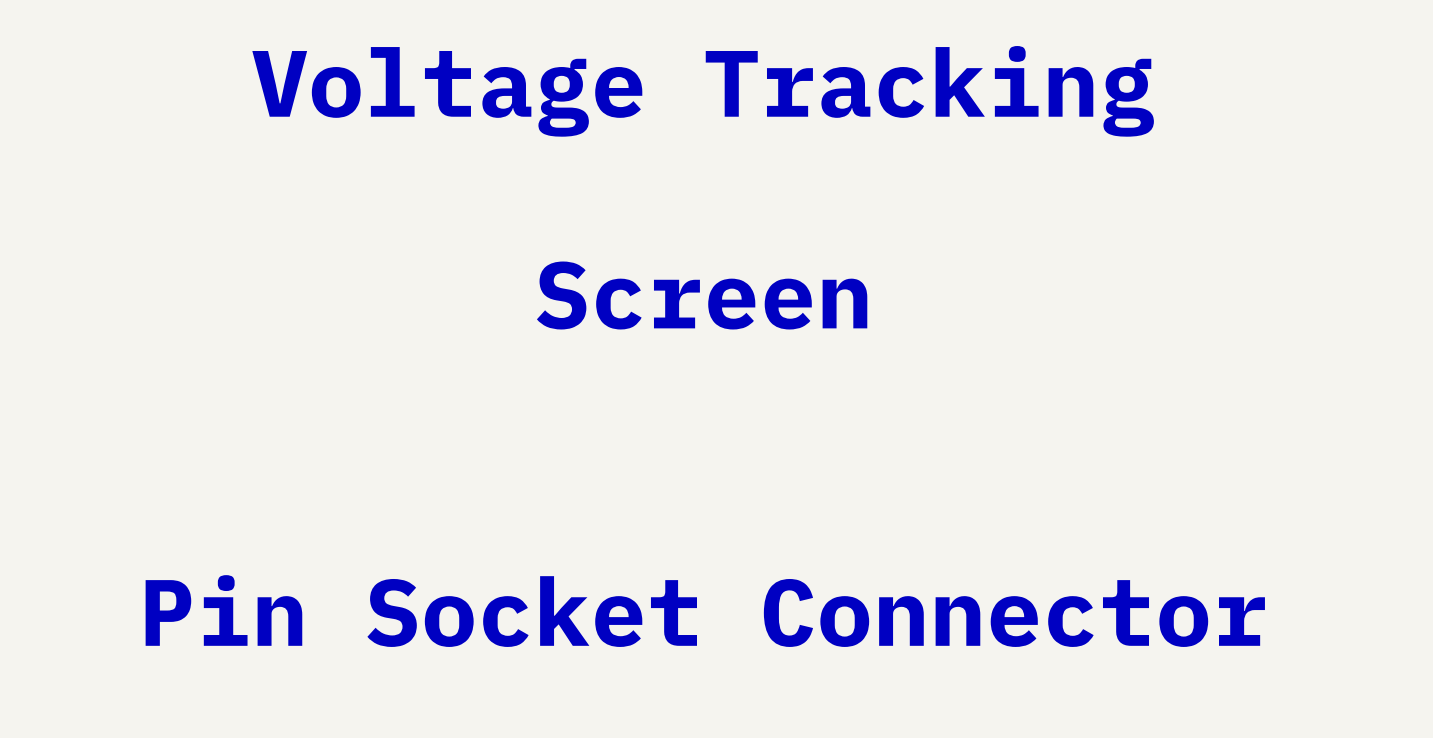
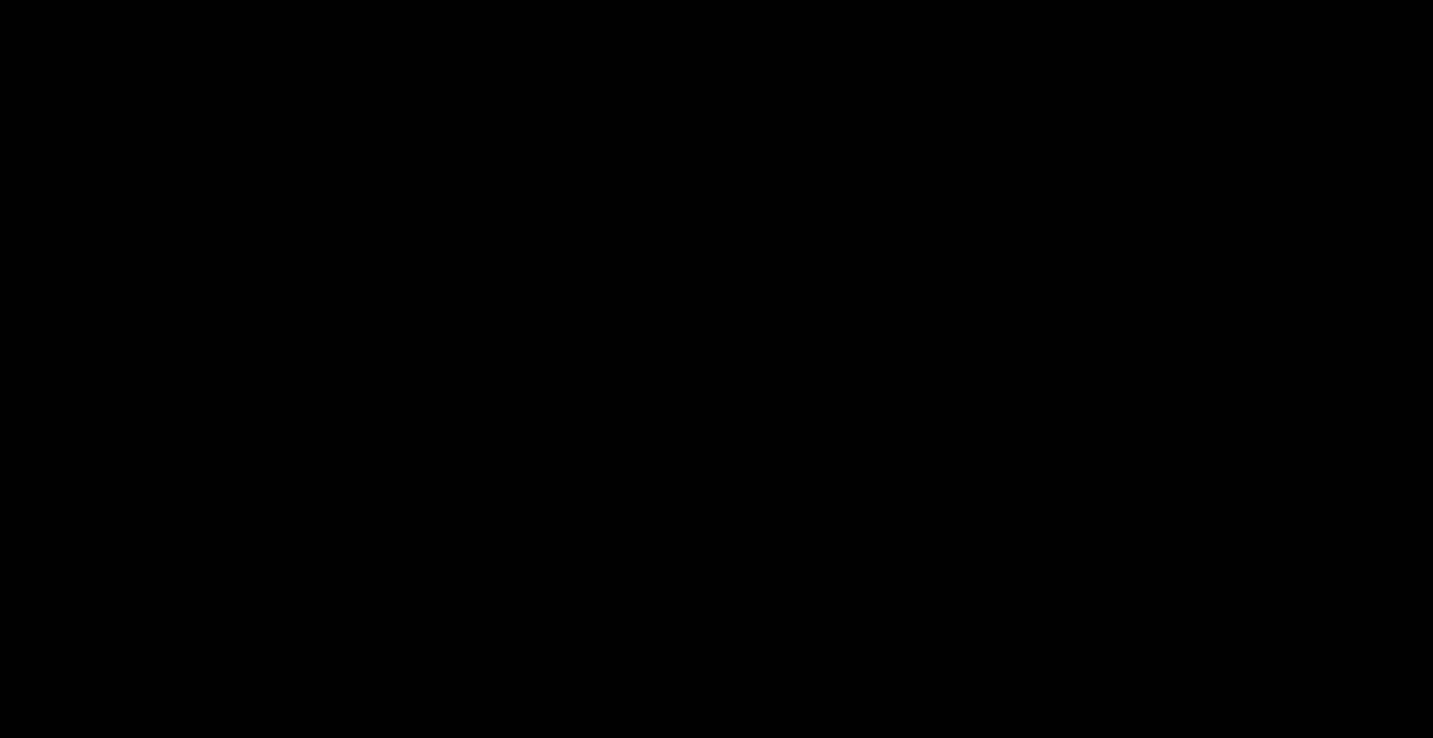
text: Voltage Tracking (703, 91) -> none
text: Screen (702, 295) -> none
text: Pin Socket Connector (705, 611) -> none

